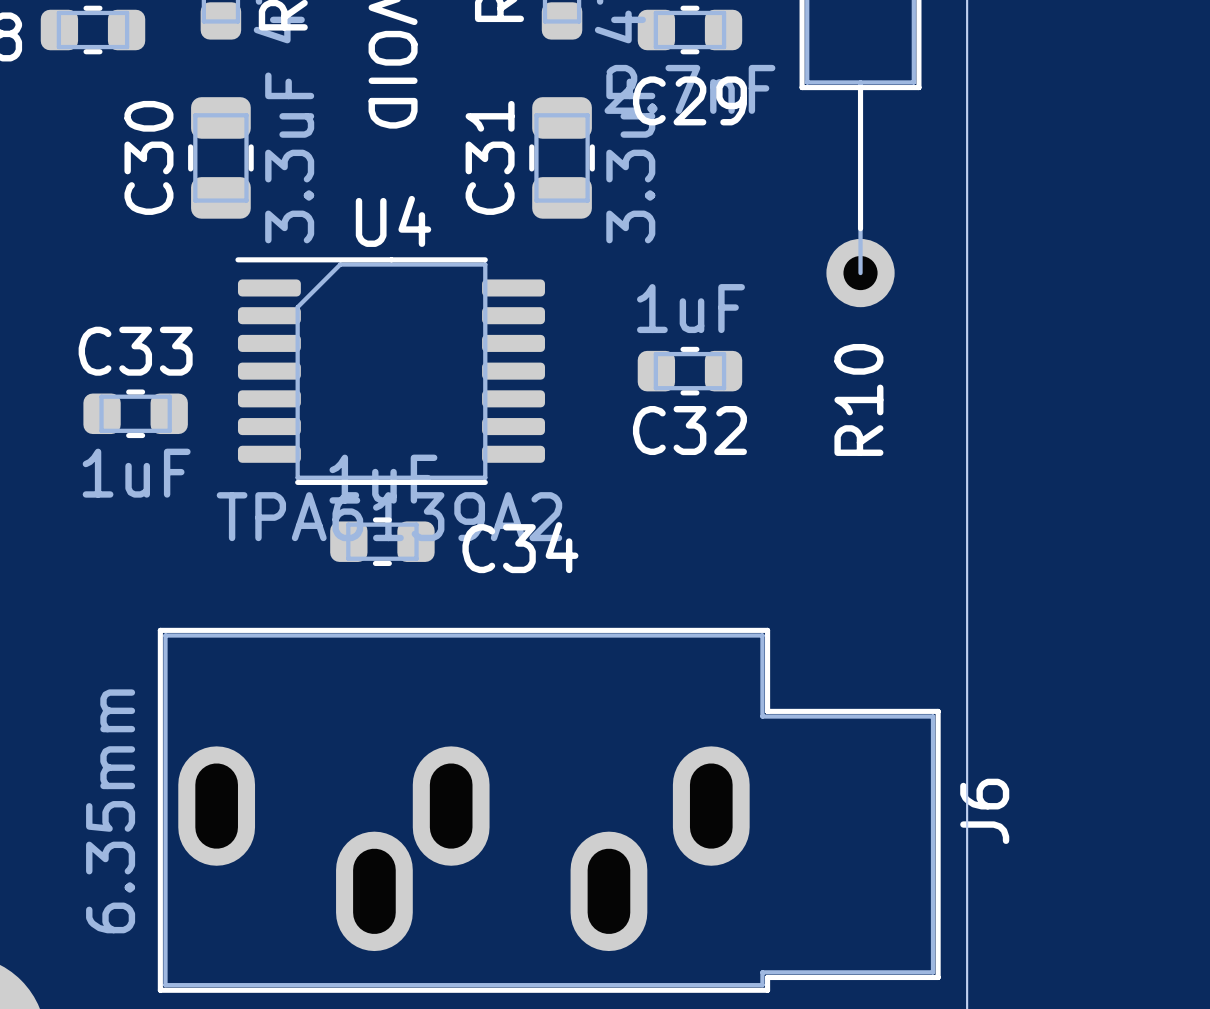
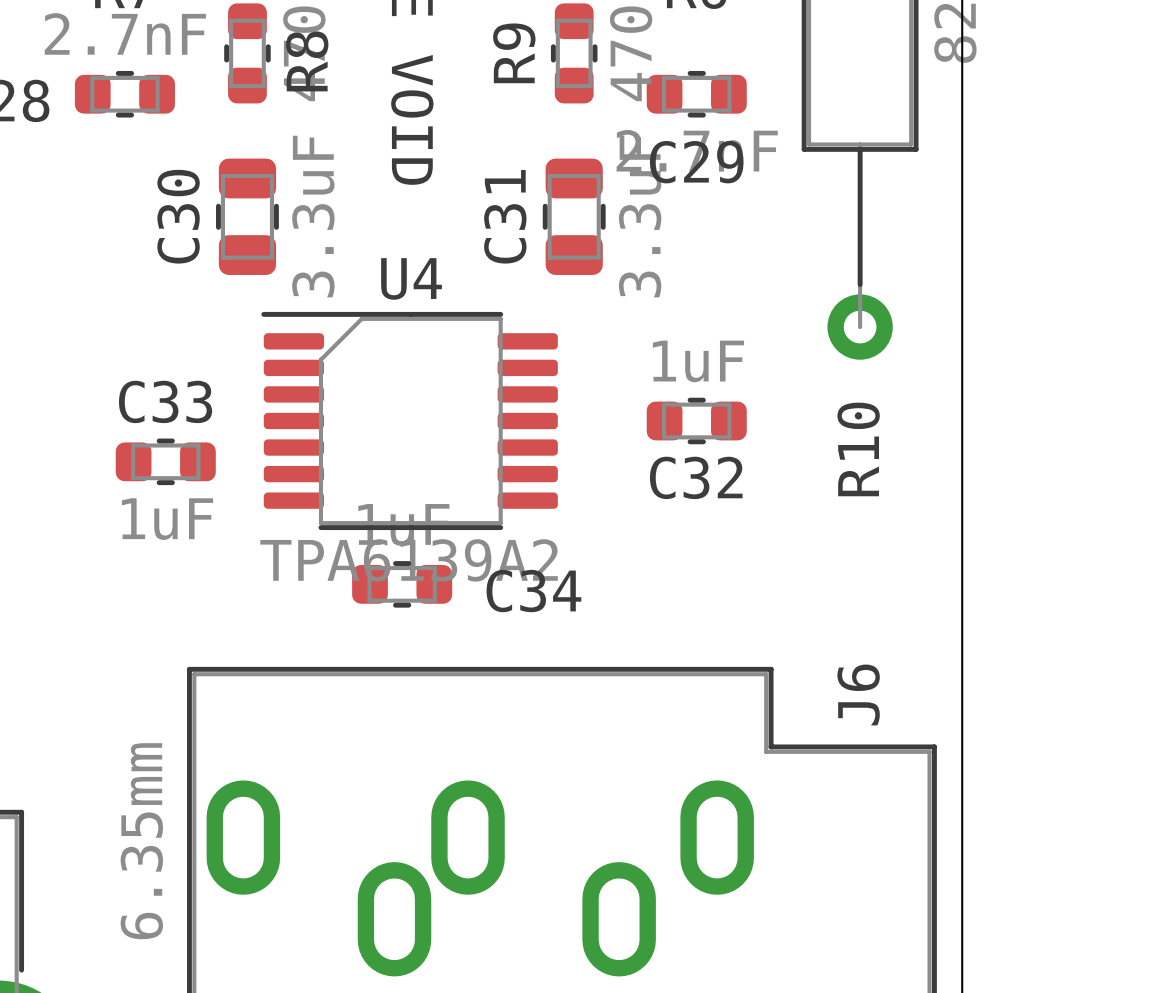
J6 name position: J6 (984, 811) -> J6 (858, 694)

